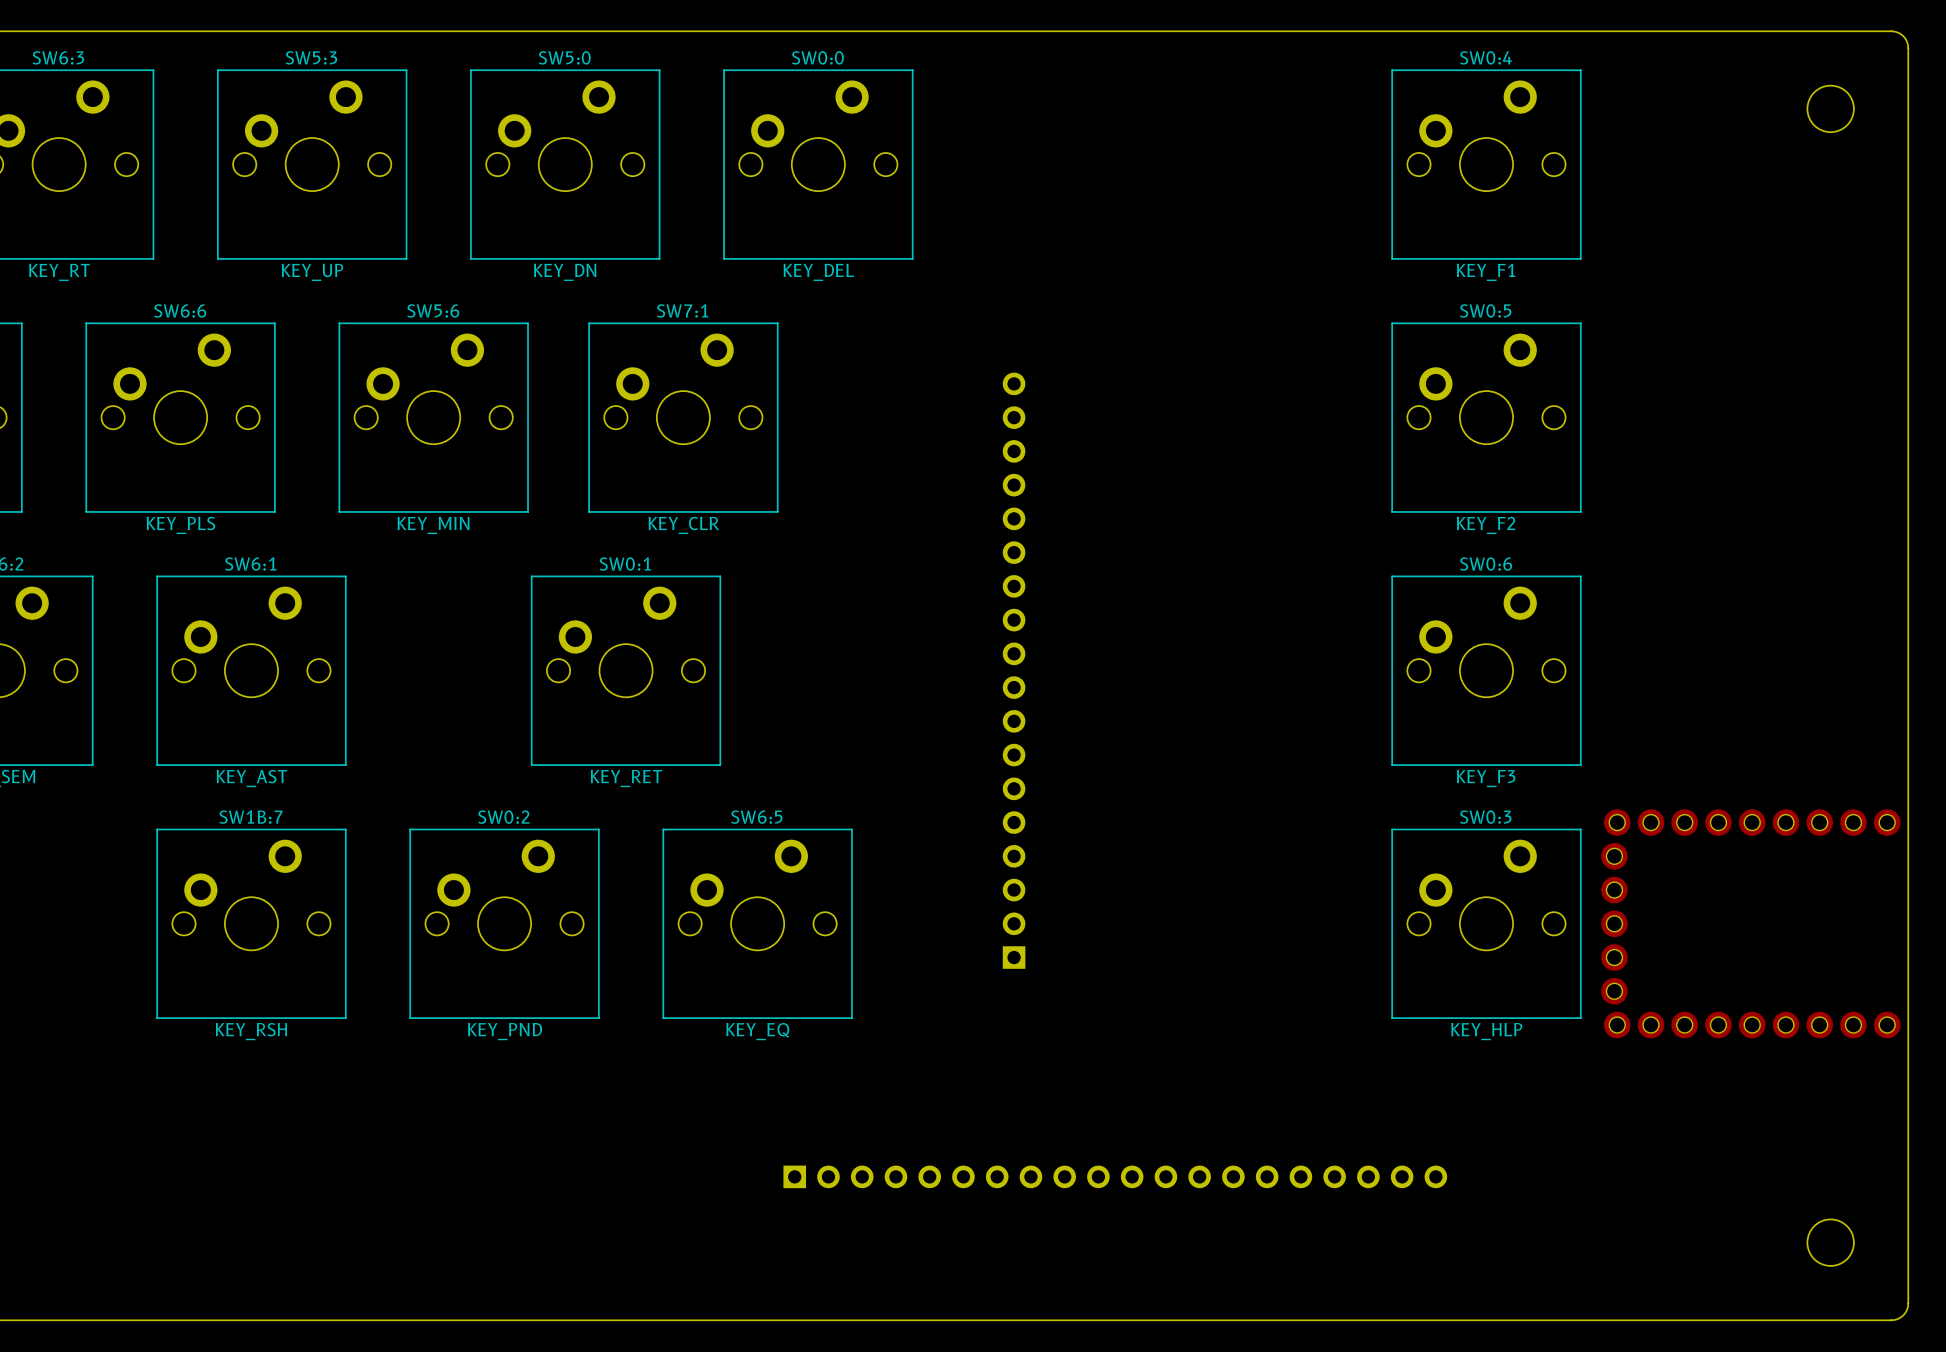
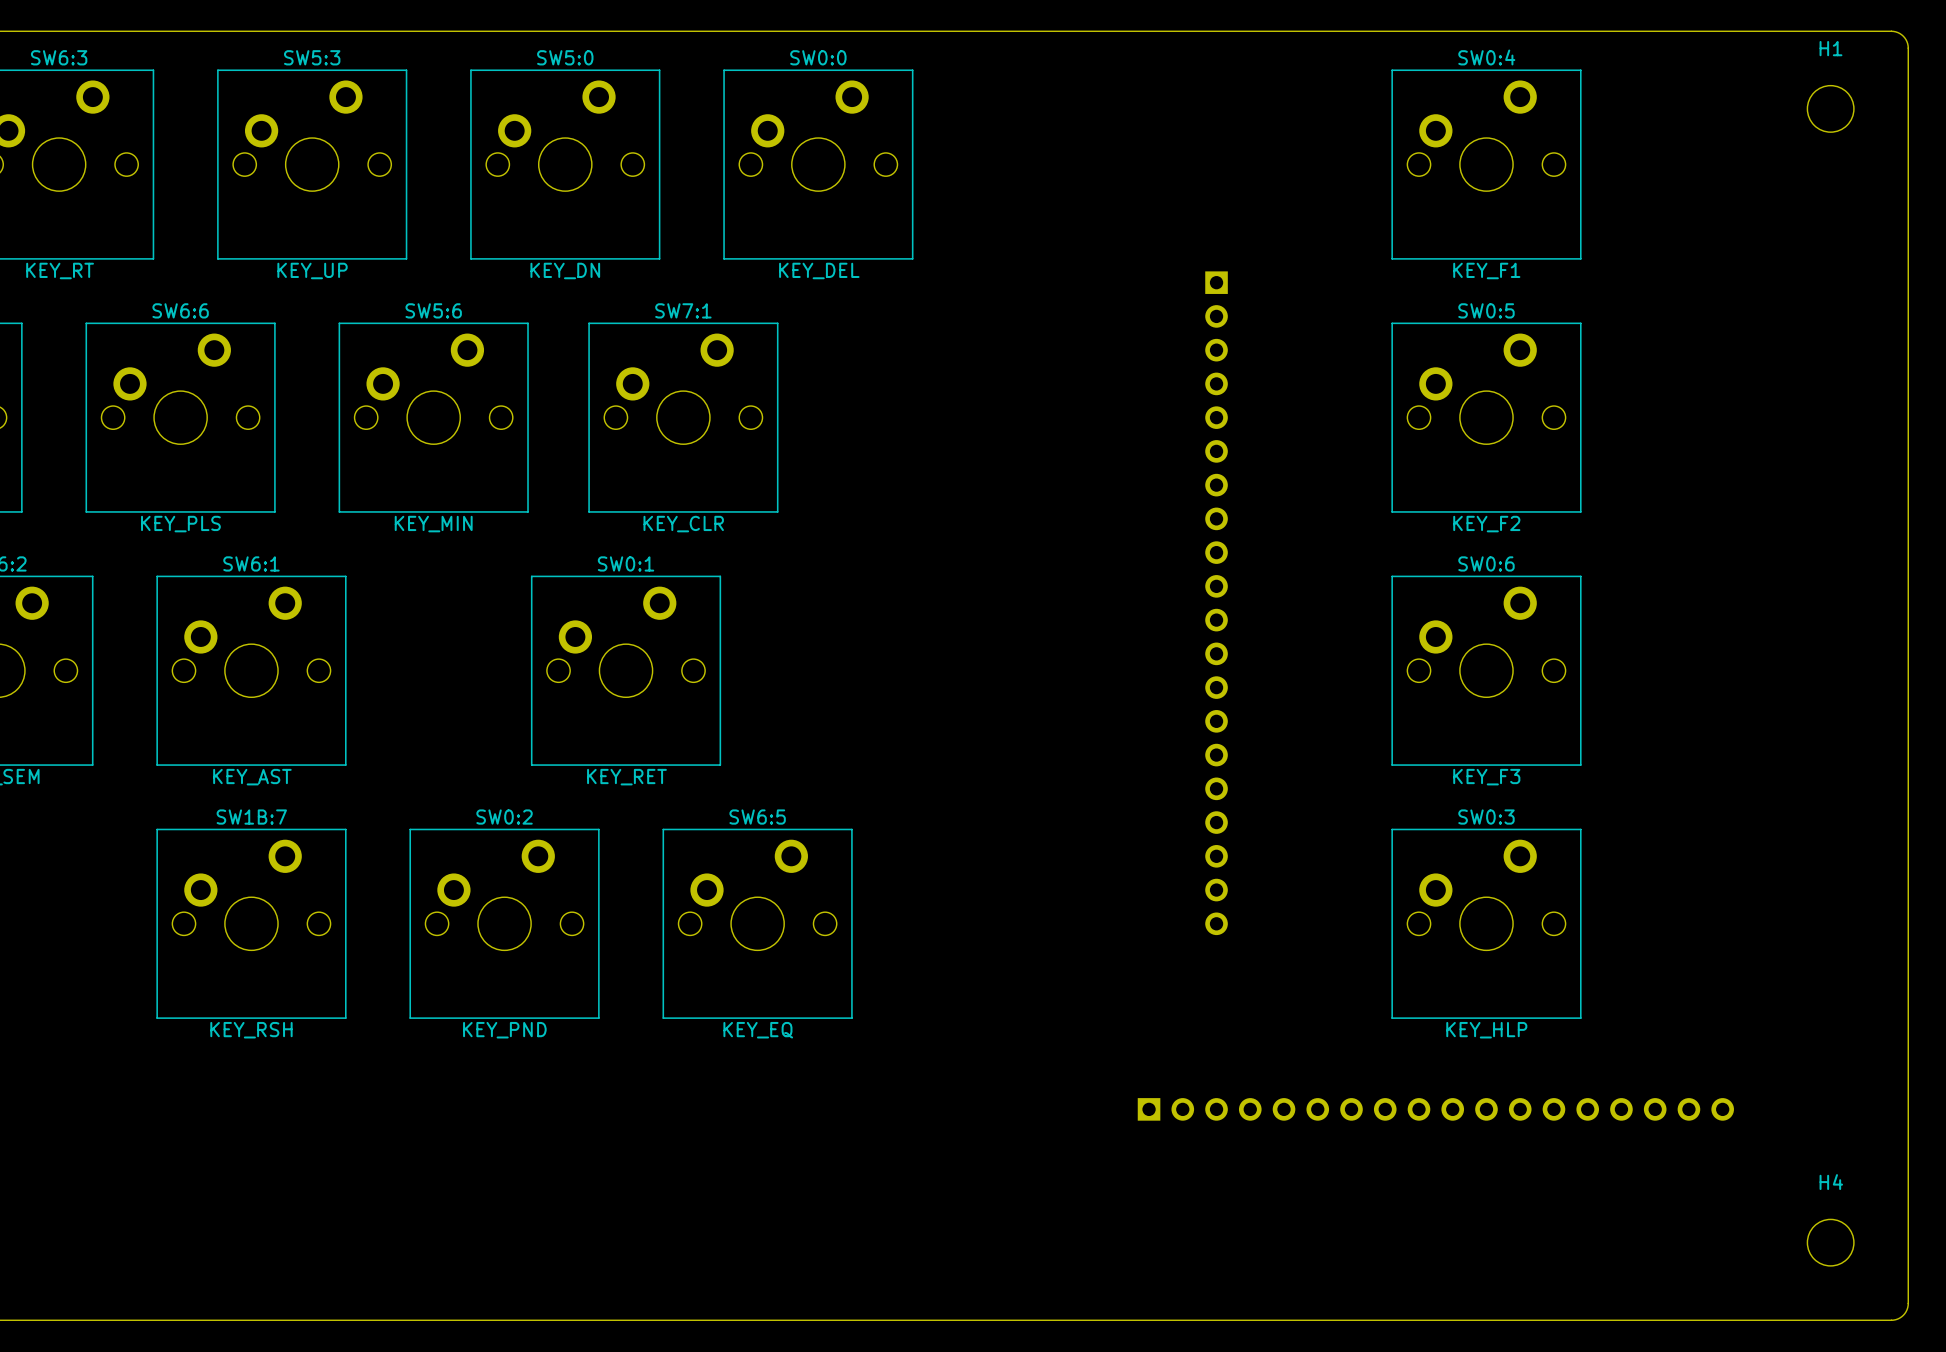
H1 name: none -> H1 (1830, 48)
part: none -> (1216, 603)
part: (1014, 670) -> none
part: (1750, 923) -> none
part: none -> (1435, 1109)
part: (1115, 1176) -> none
H4 name: none -> H4 (1831, 1182)

